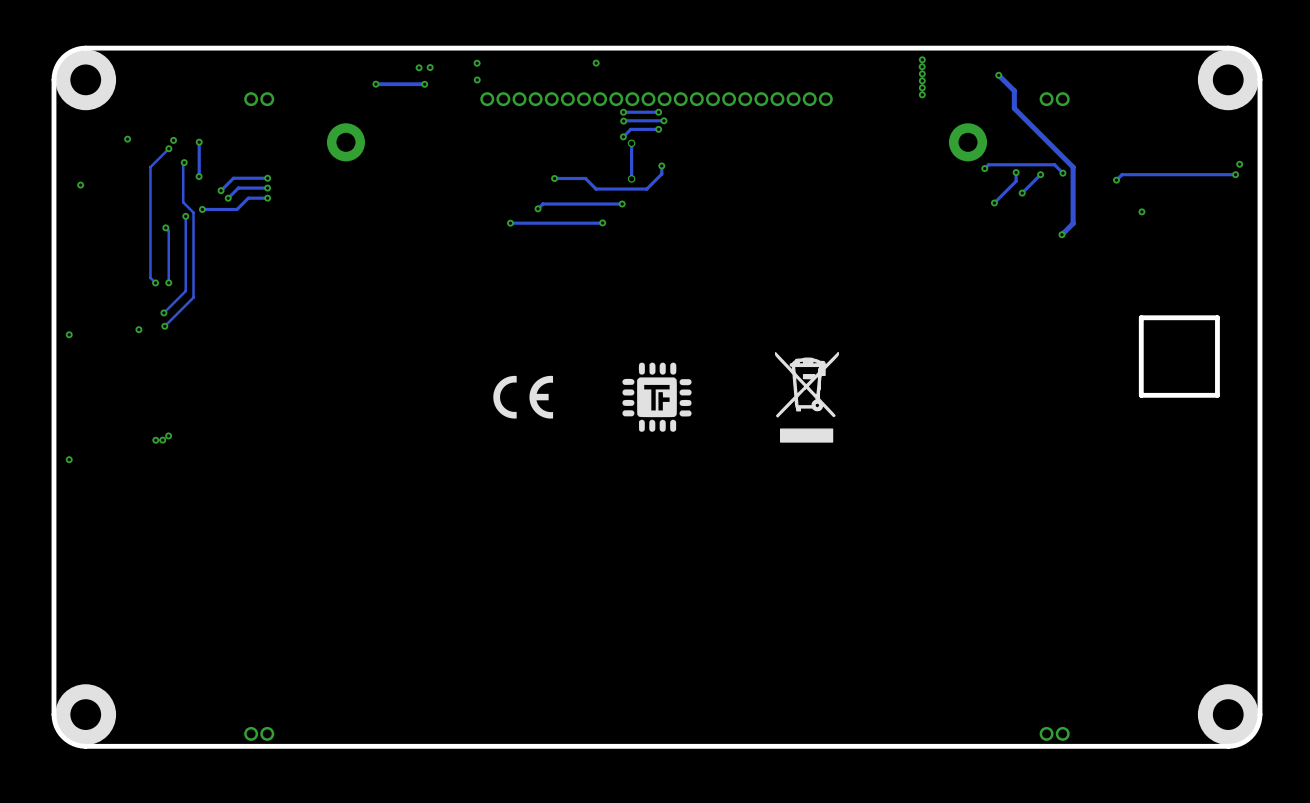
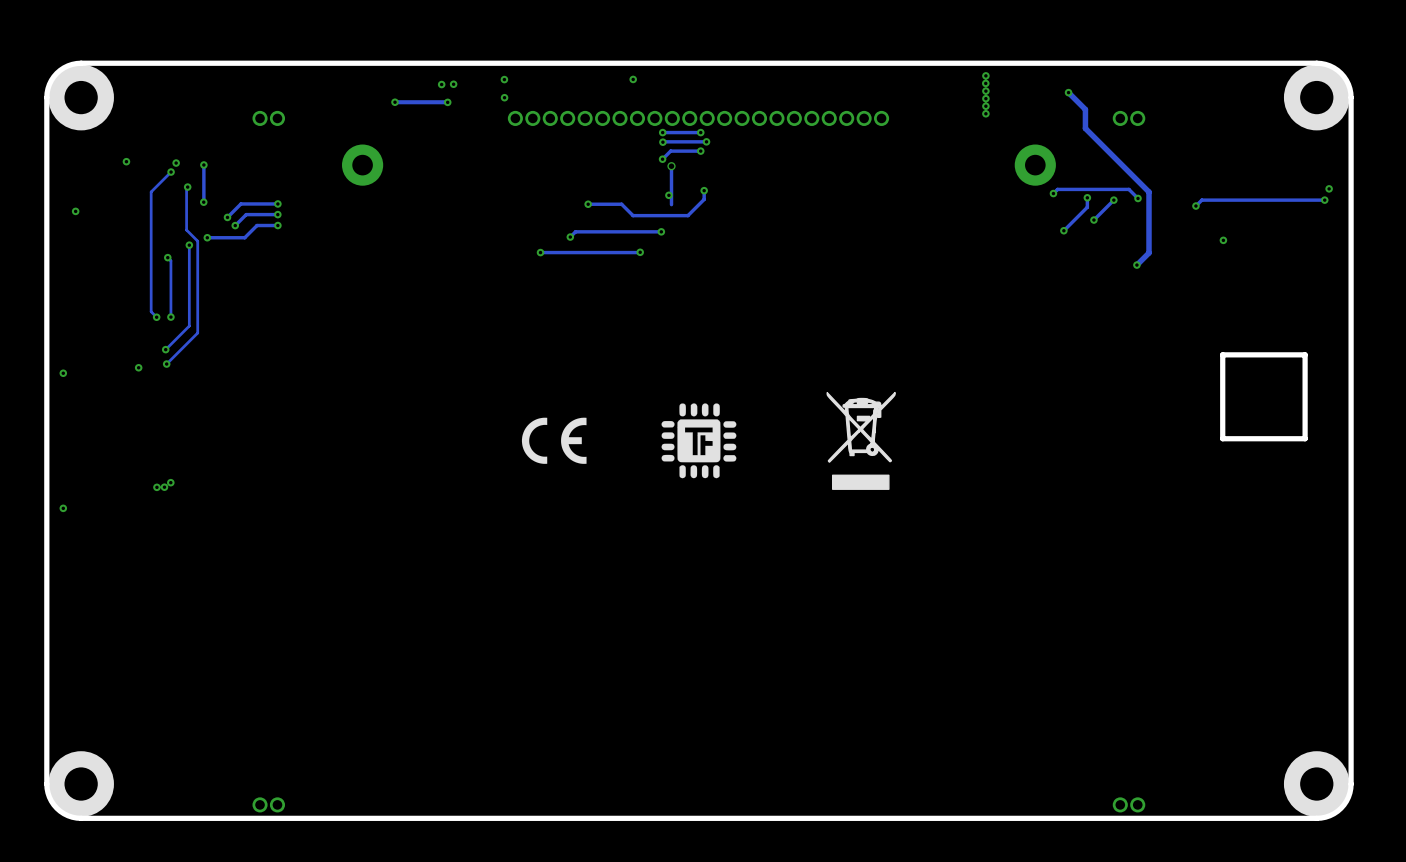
via: none -> (668, 195)
via: (631, 178) -> none

